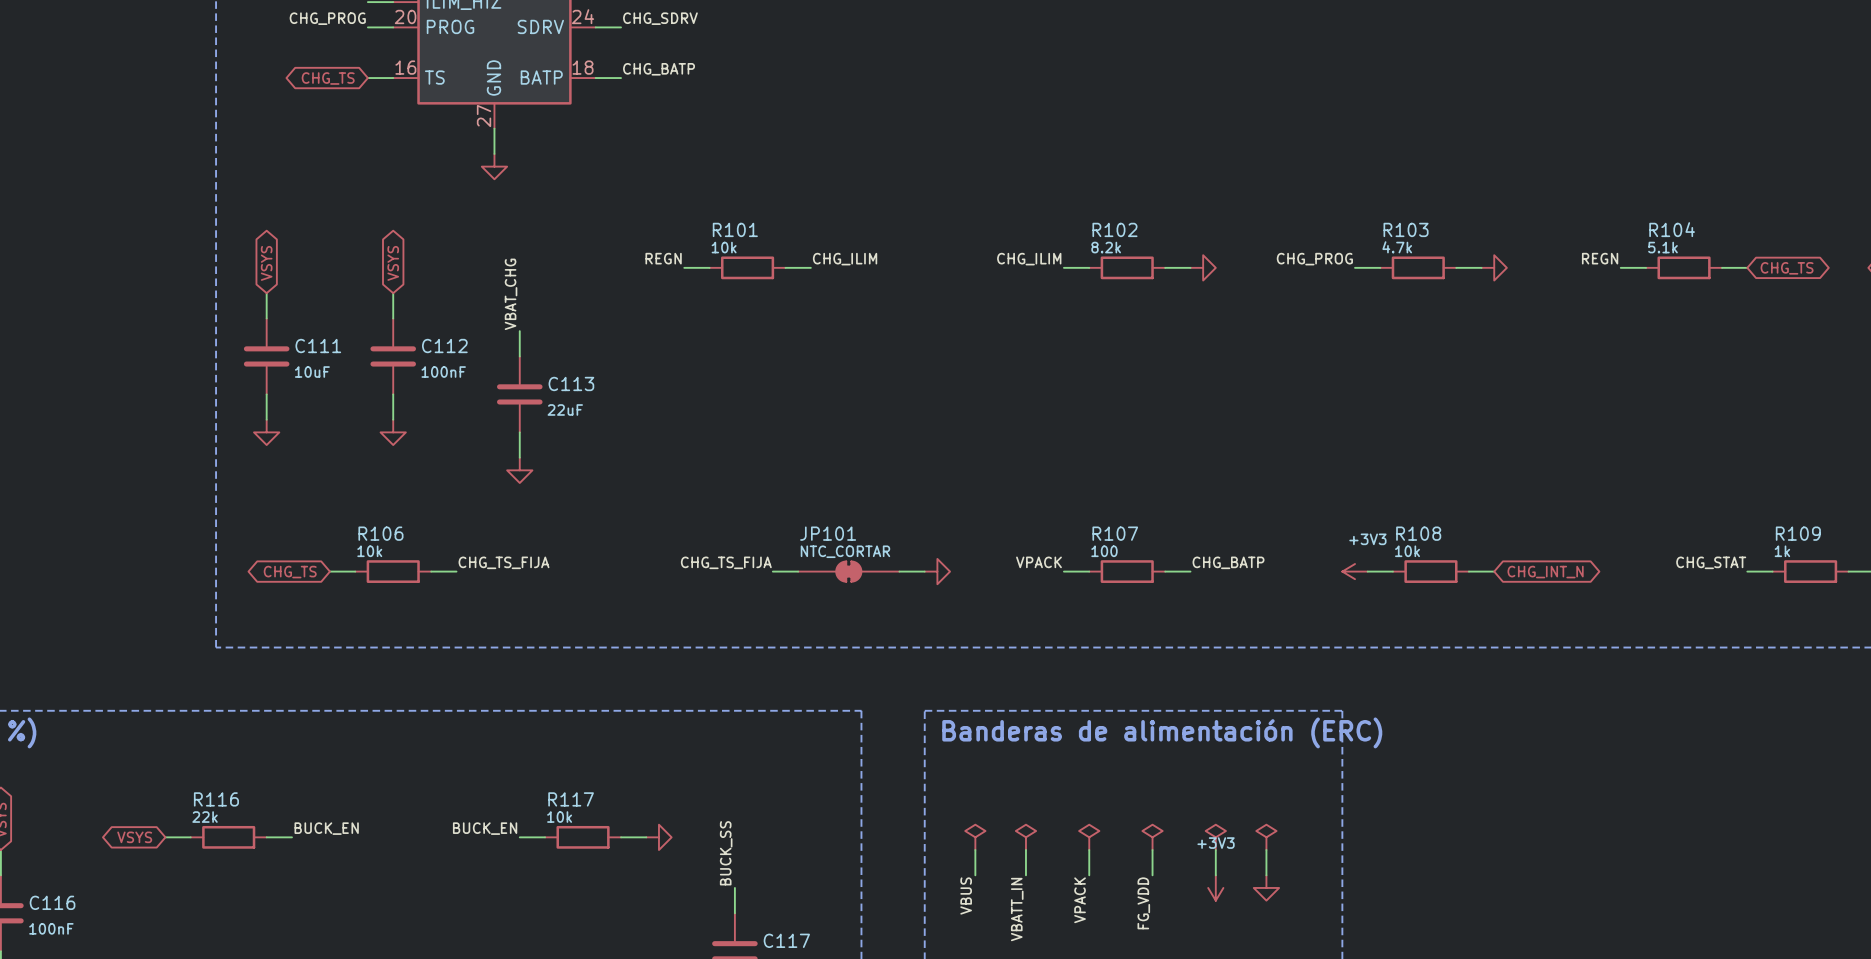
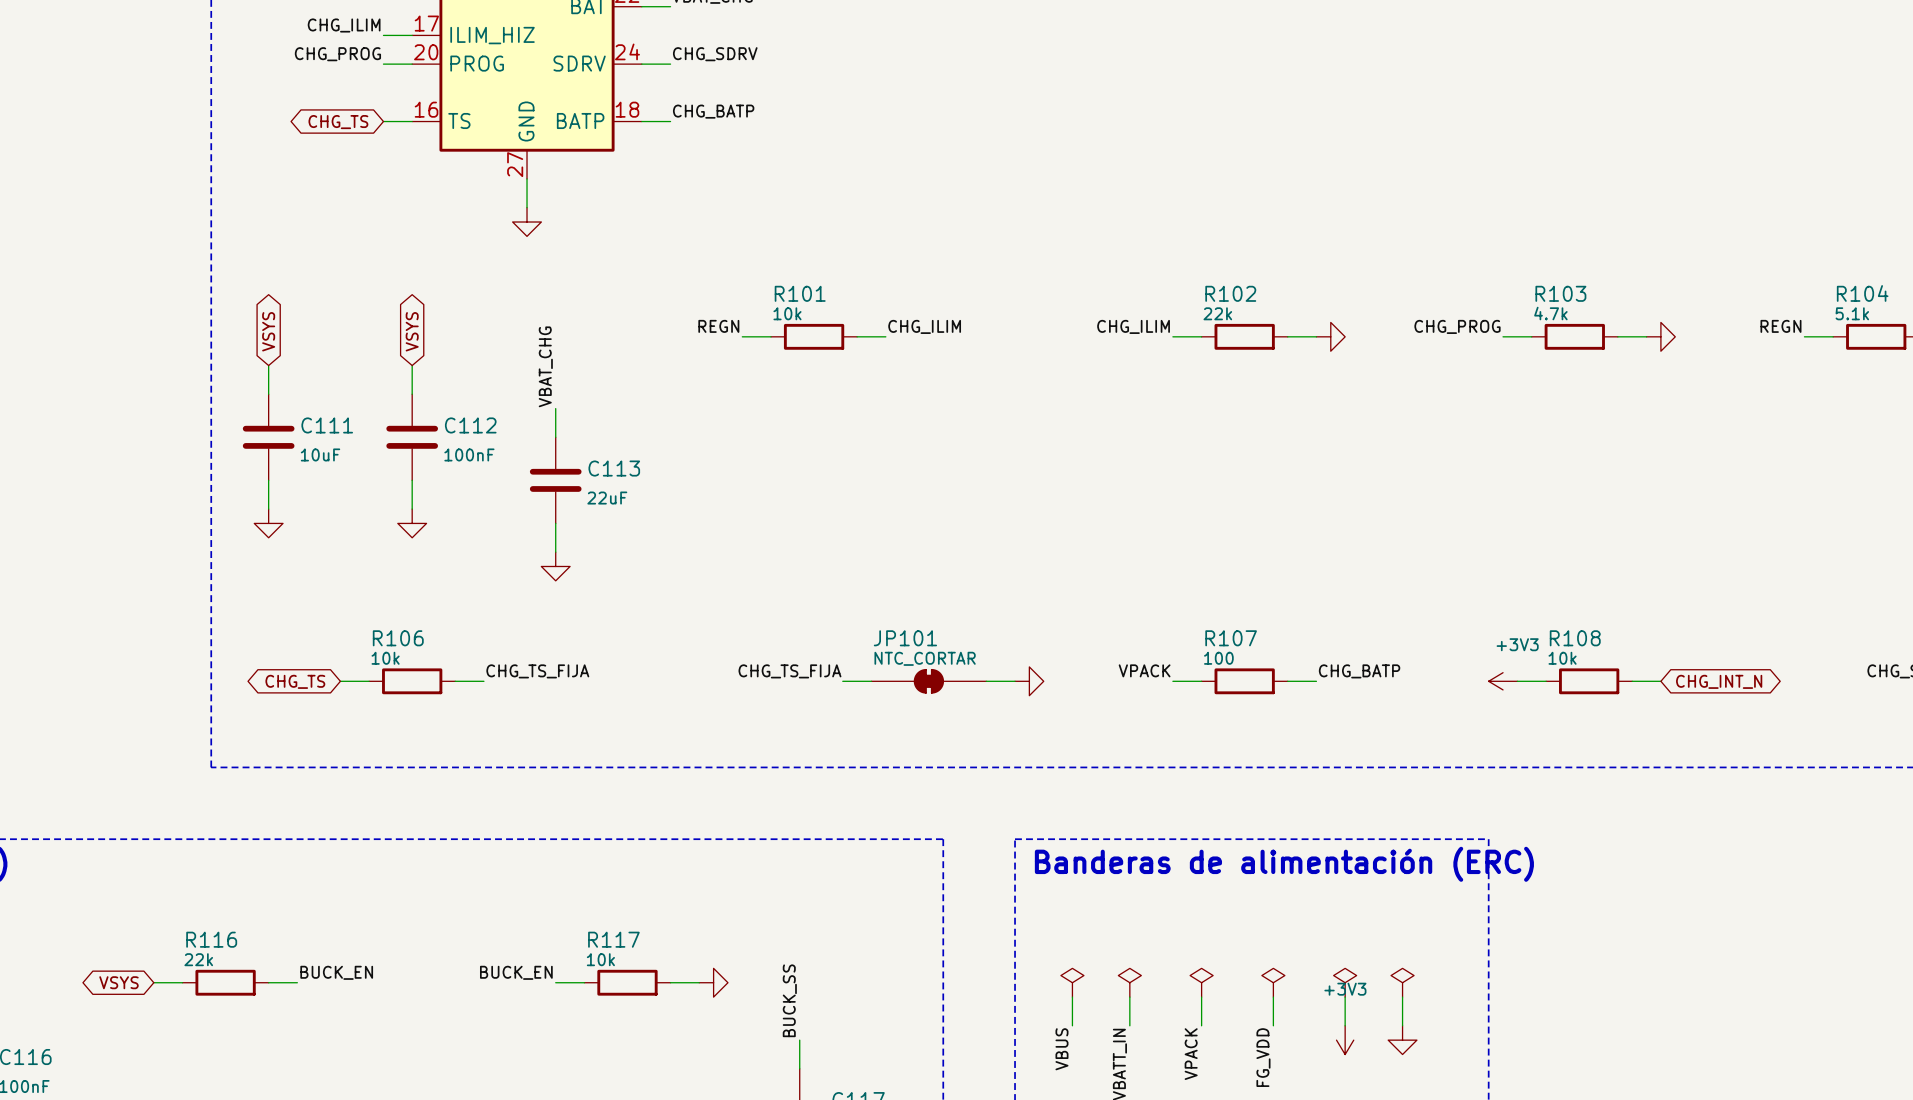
R102 value: 8.2k (1106, 247) -> 22k (1217, 313)

